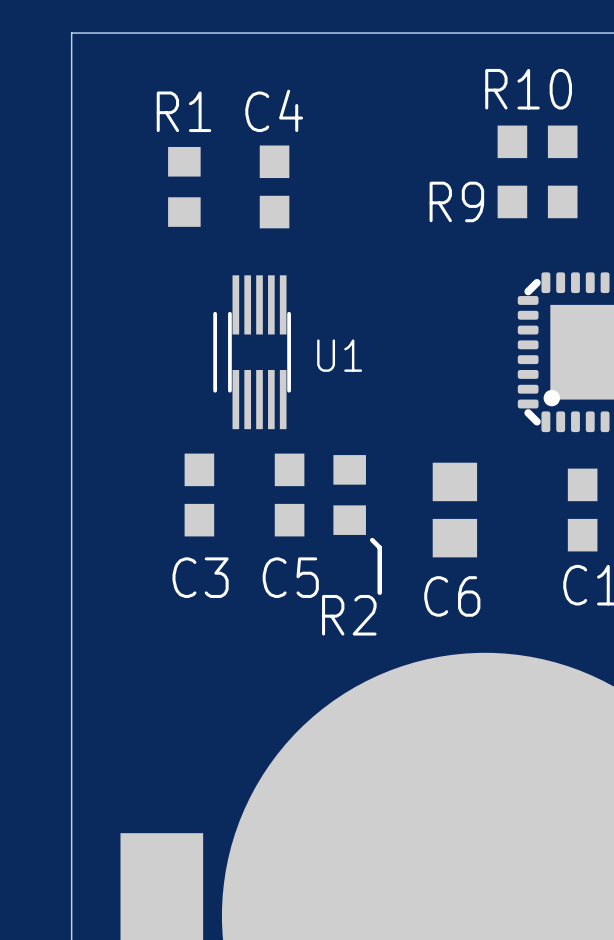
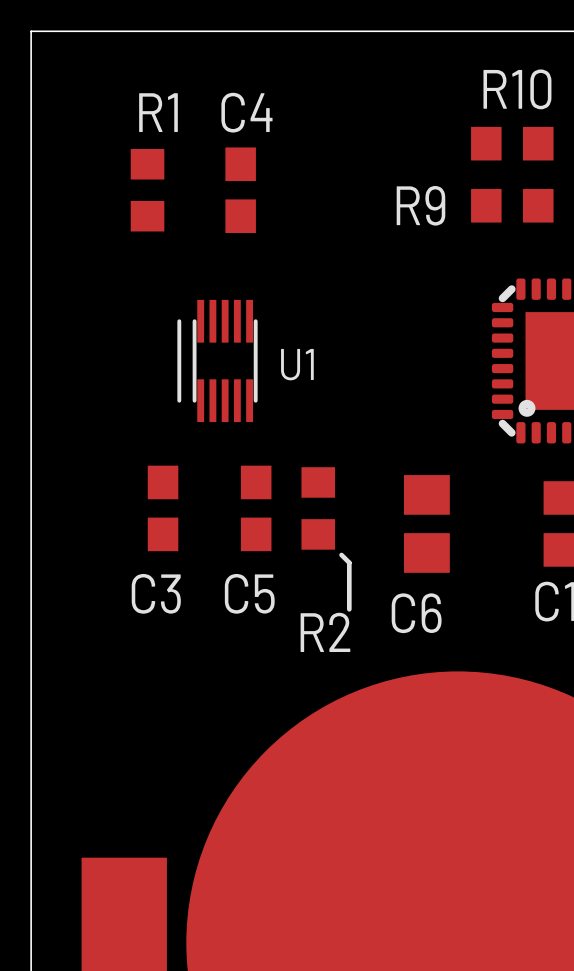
U1 footprint: [213, 275, 291, 430] -> [177, 299, 258, 423]

